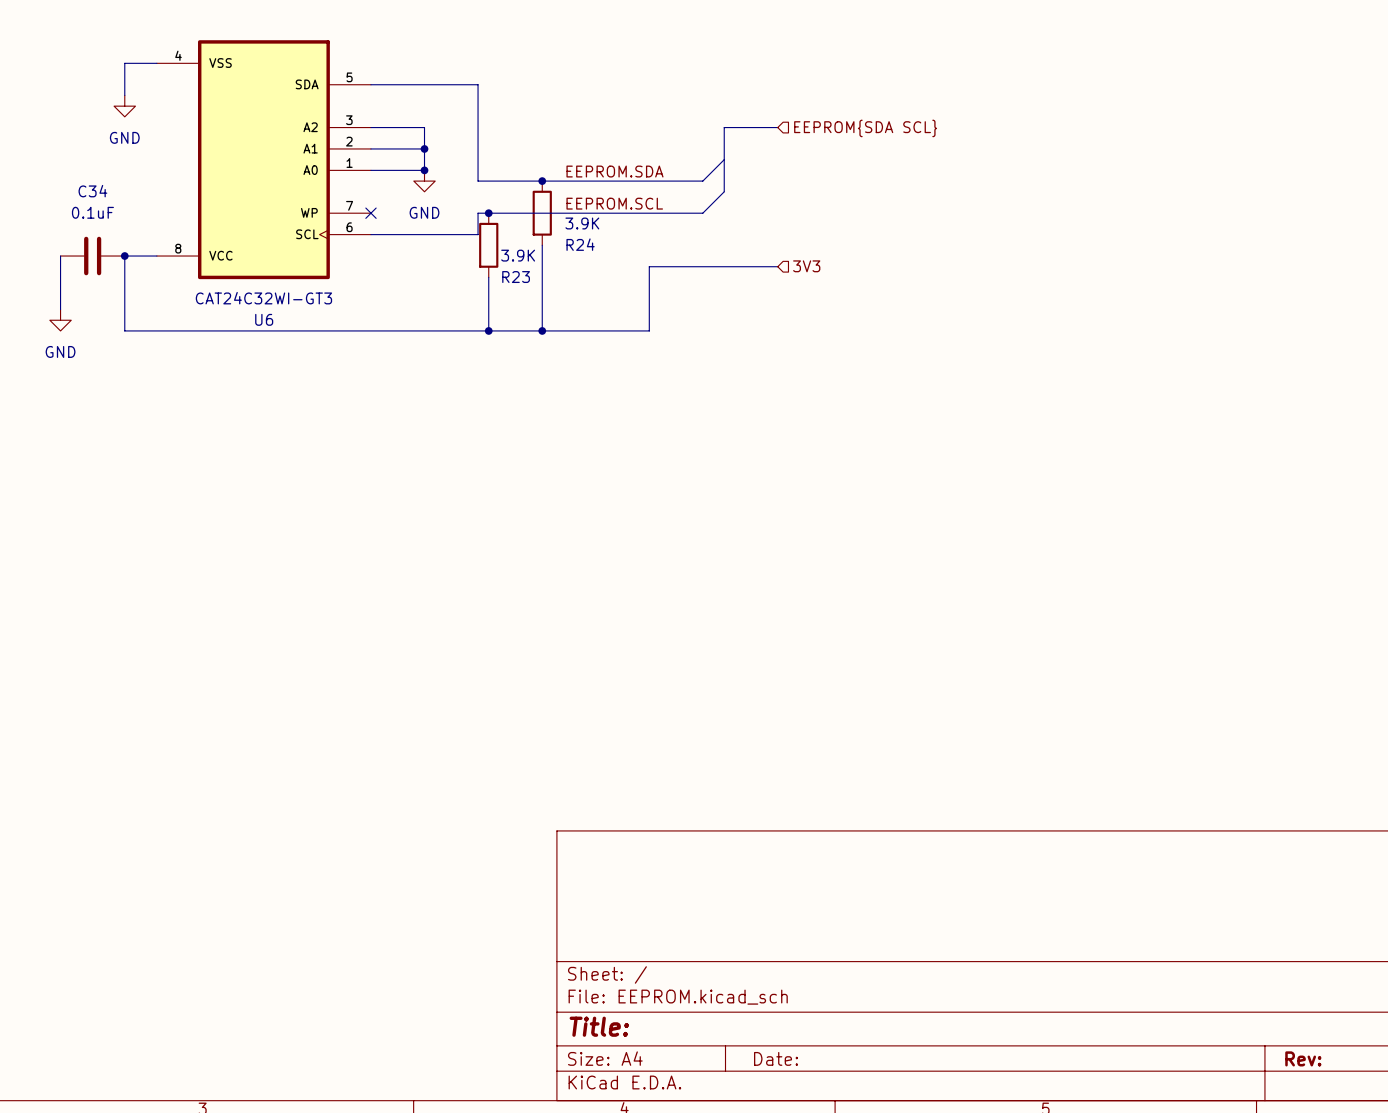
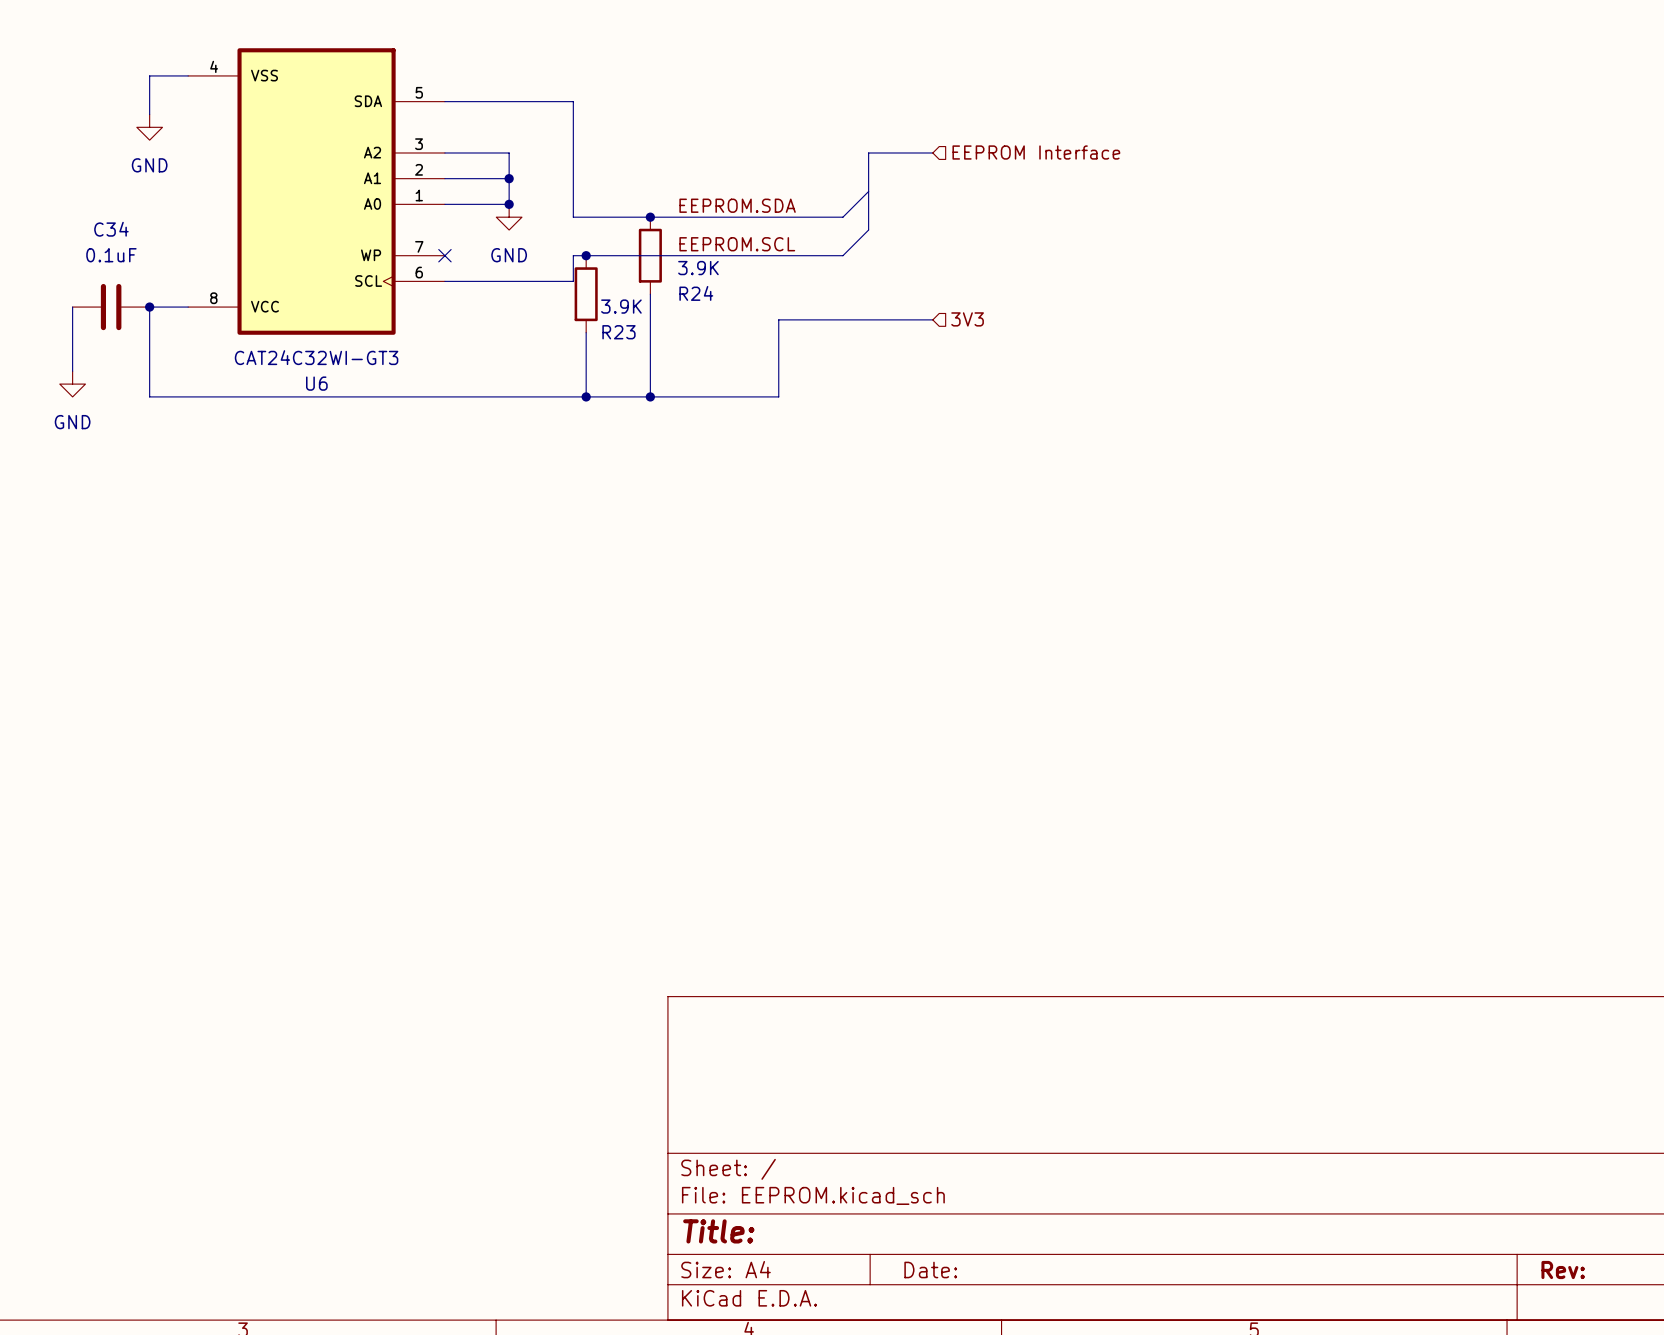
hierarchical label: EEPROM{SDA SCL} (865, 128) -> EEPROM Interface (1036, 152)

